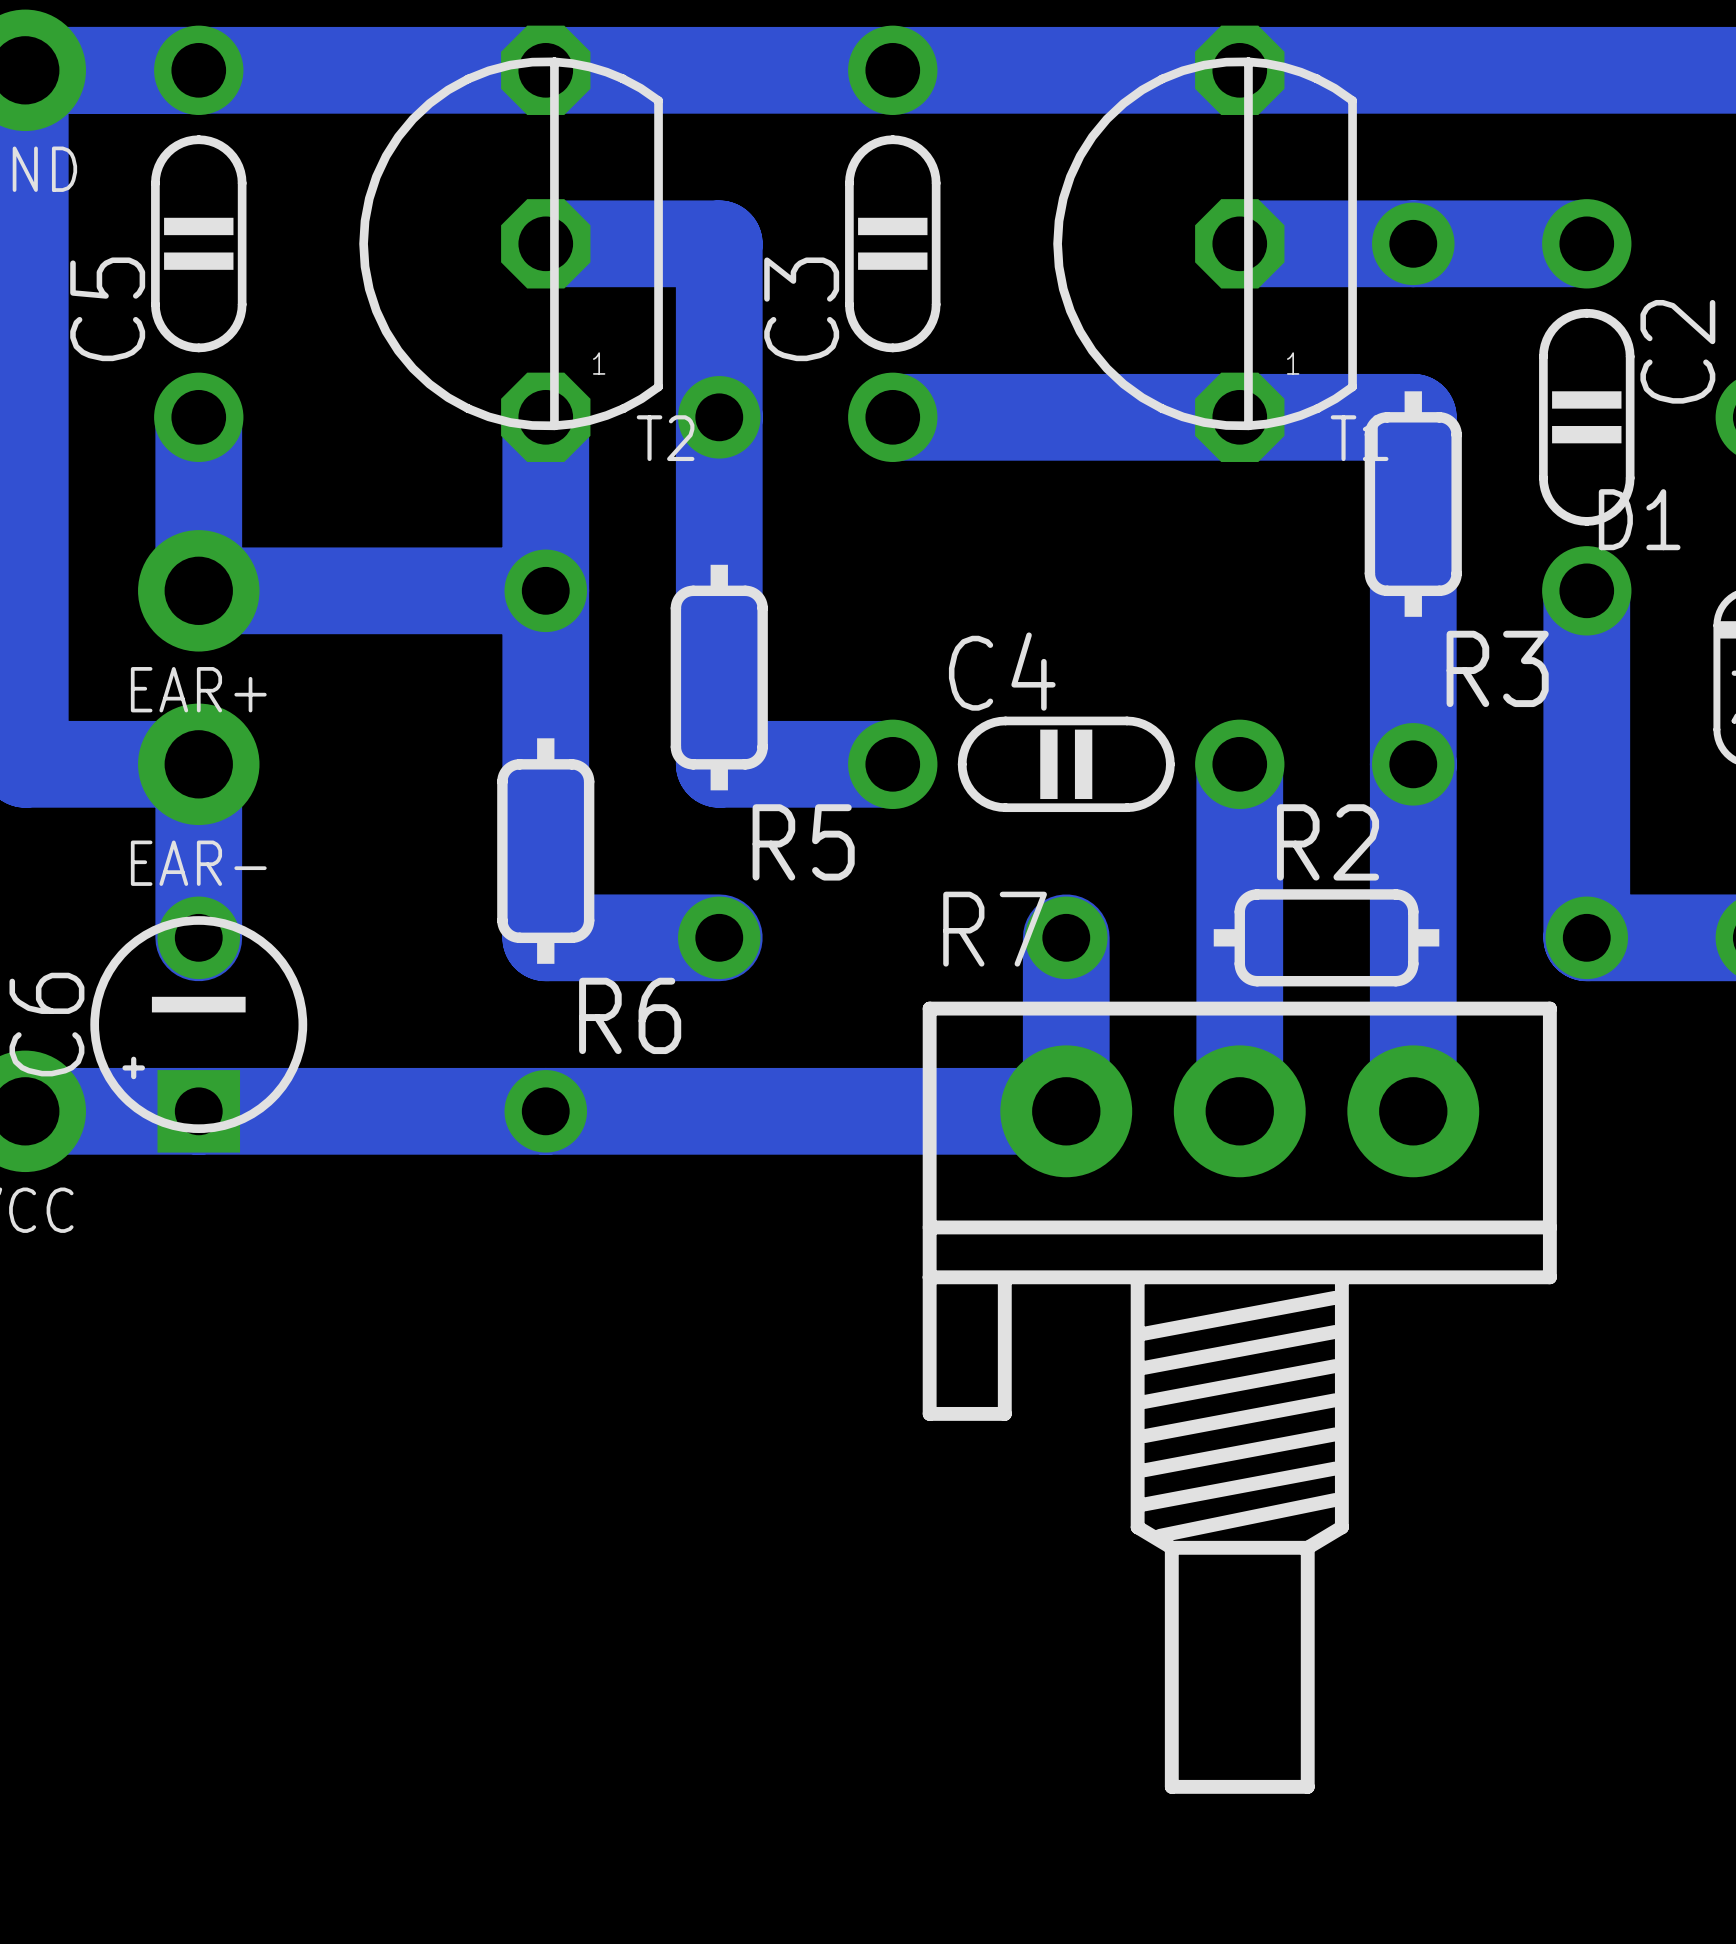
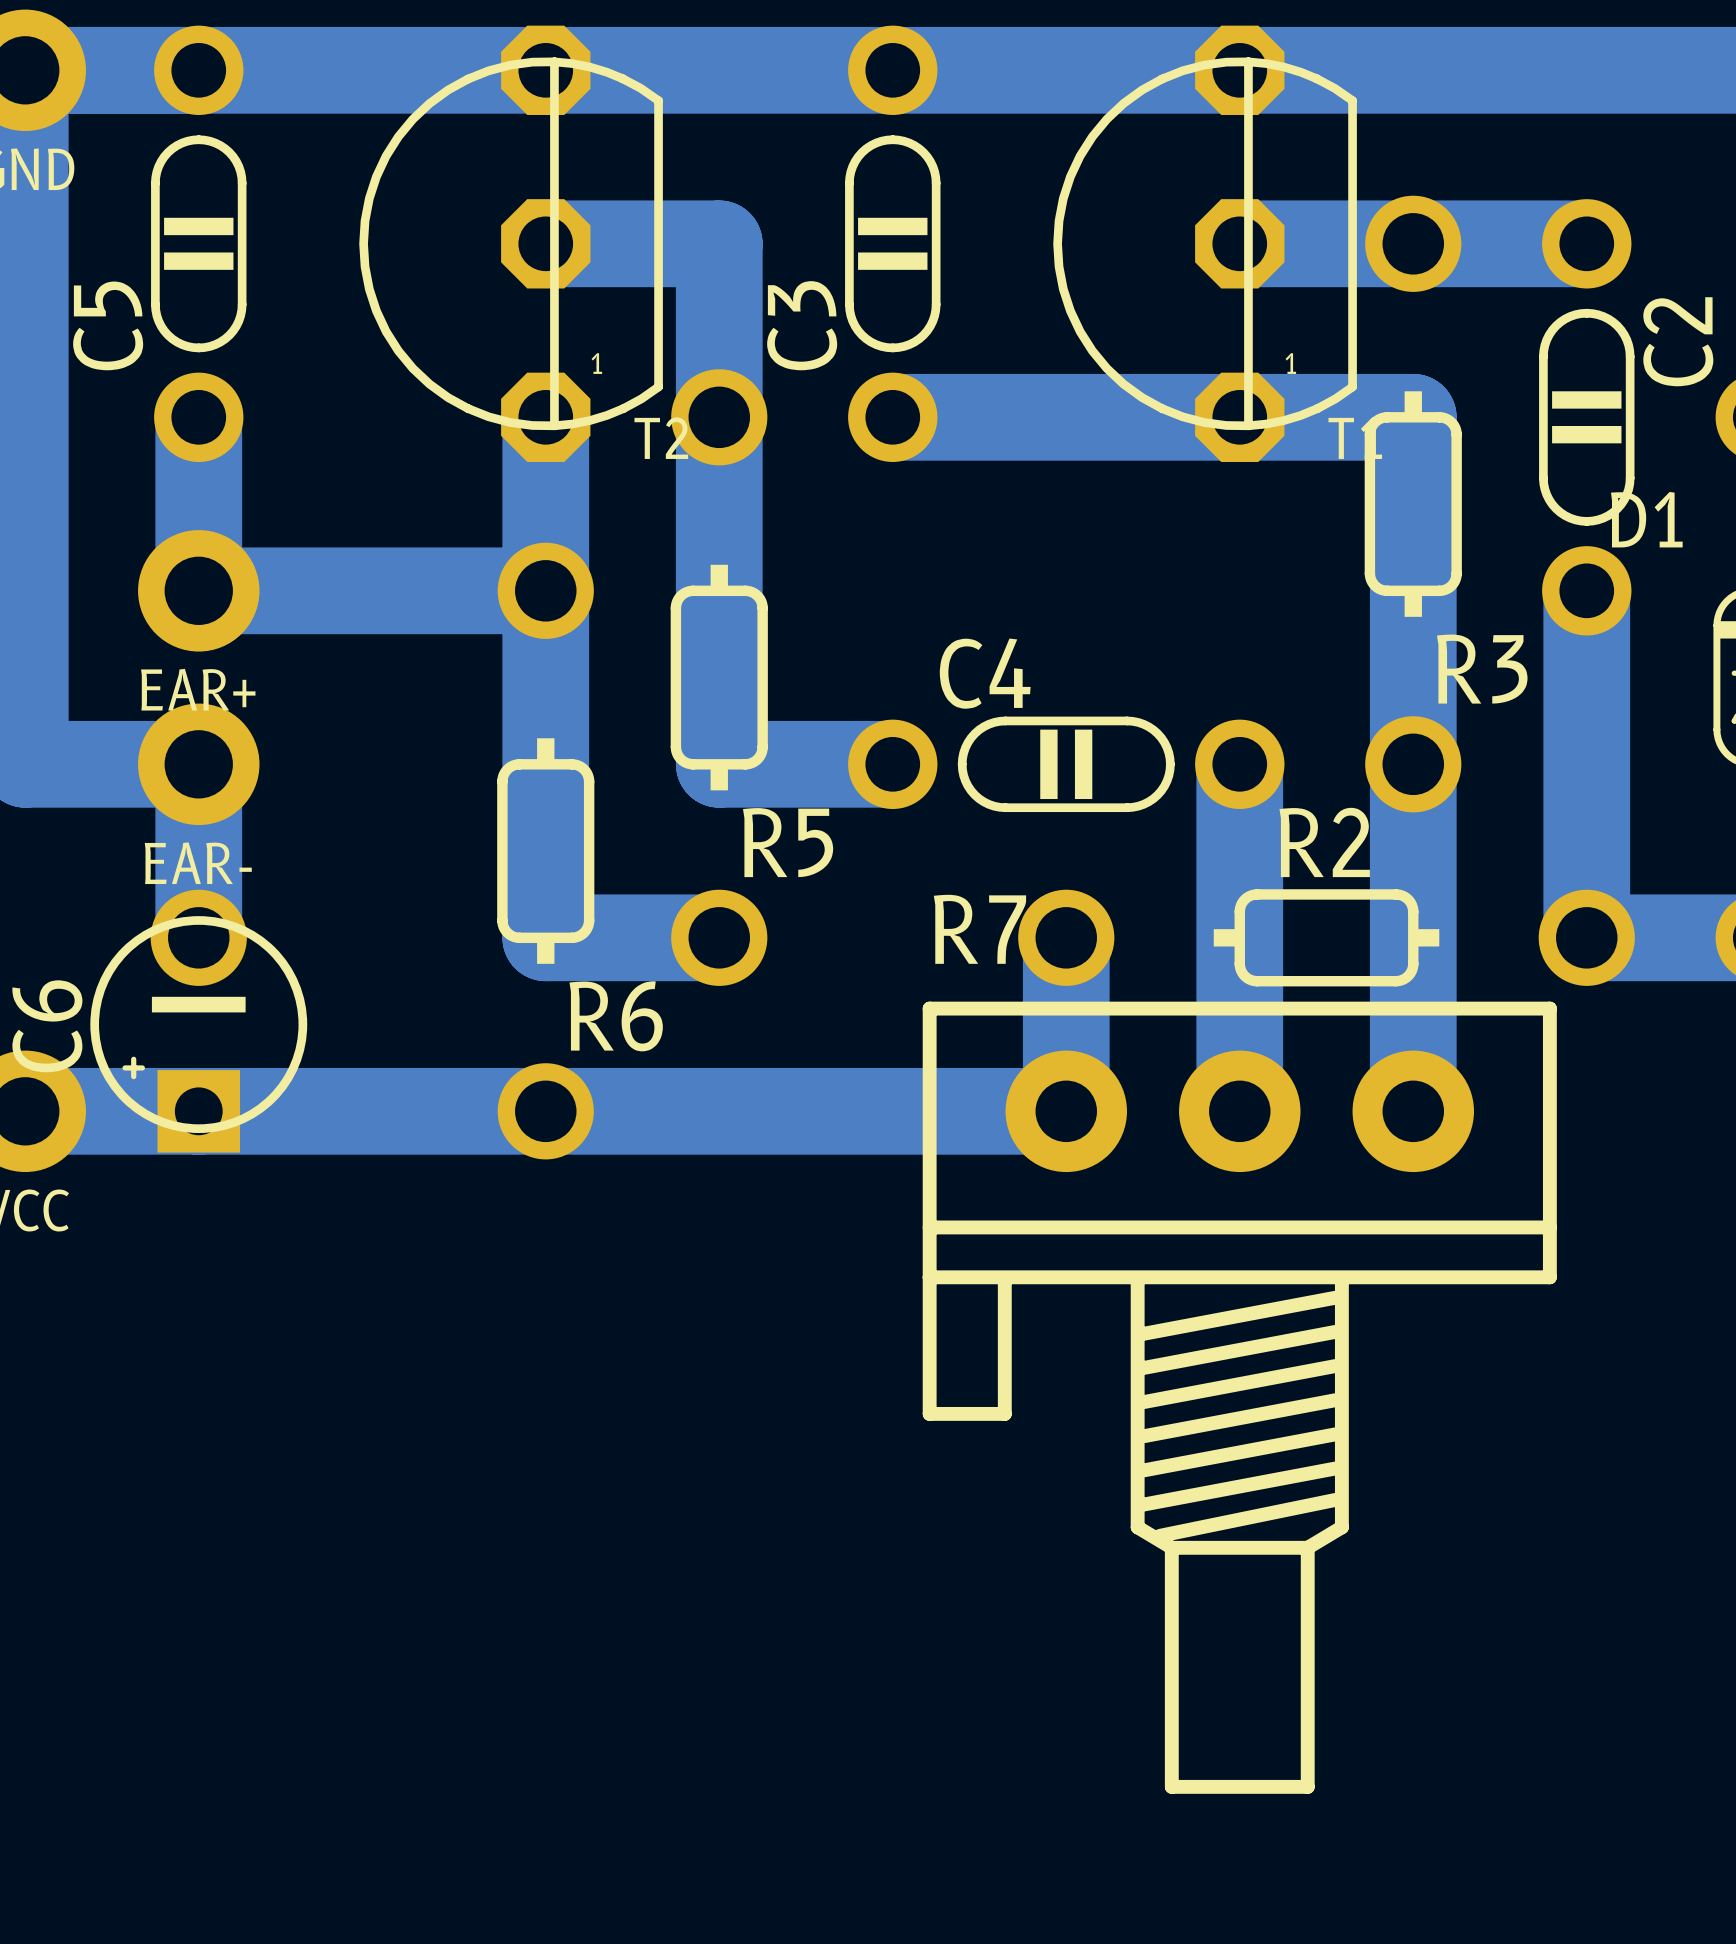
R3 footprint: [1364, 202, 1462, 806] -> [1364, 195, 1462, 813]
R5 footprint: [670, 376, 768, 980] -> [670, 369, 768, 986]
R6 footprint: [497, 549, 595, 1153] -> [497, 542, 595, 1160]
R2 footprint: [1025, 889, 1629, 987] -> [1018, 889, 1635, 987]
C6 footprint: [90, 896, 308, 1153] -> [90, 889, 308, 1153]
R7 footprint: [922, 1001, 1557, 1794] -> [922, 1001, 1557, 1794]

